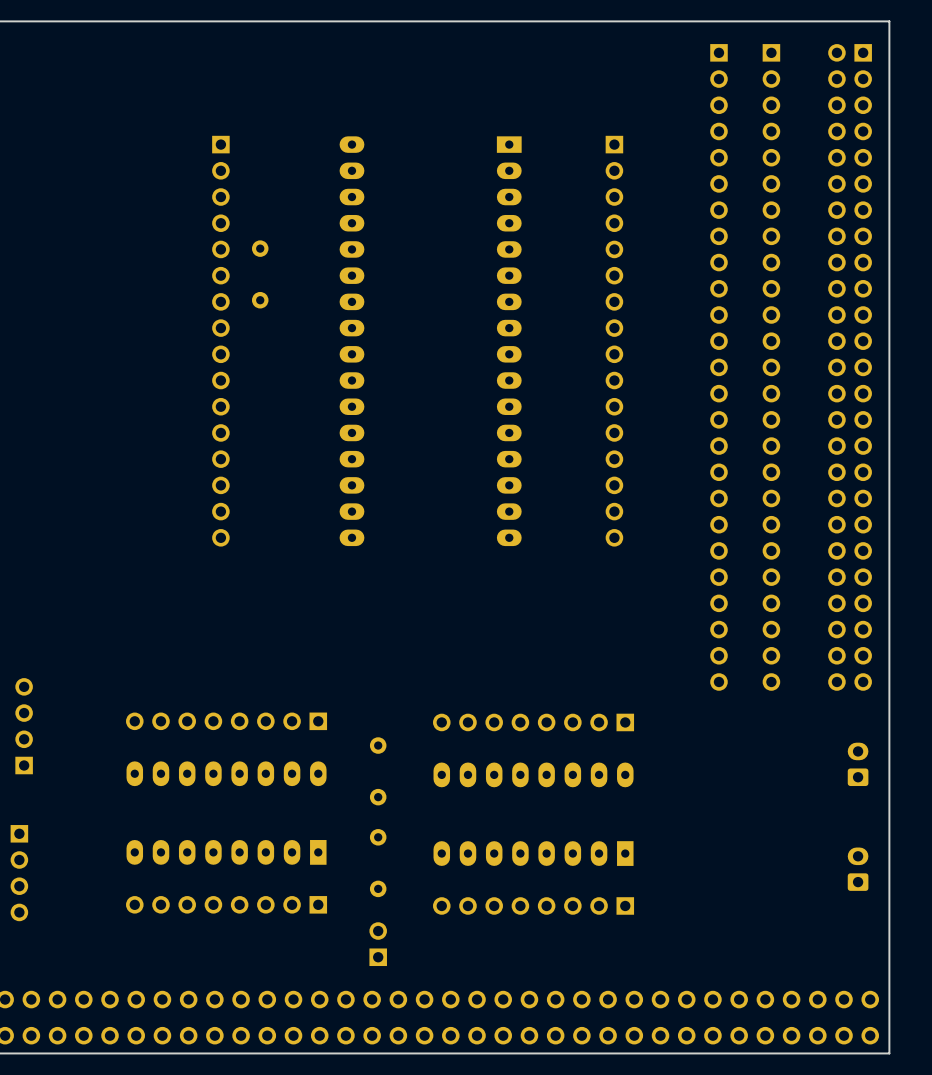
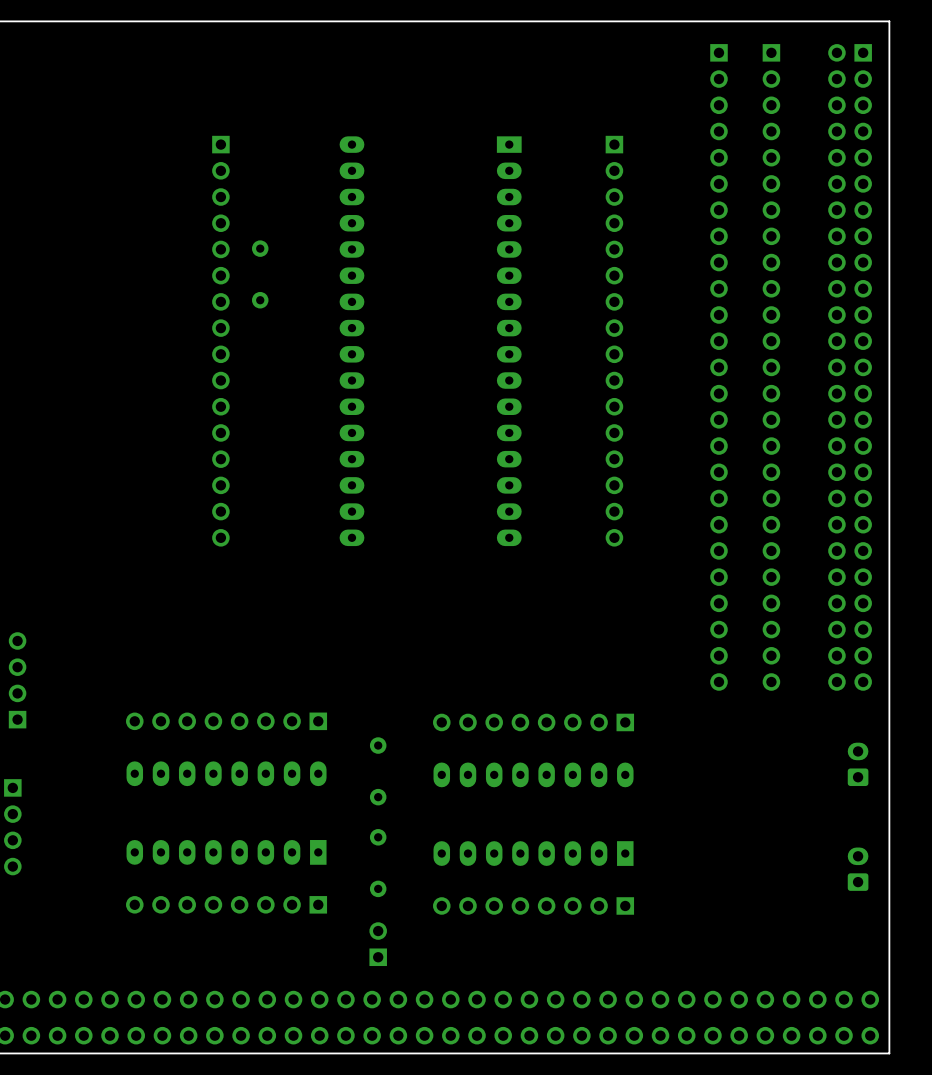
part position: (24, 726) -> (17, 680)
part position: (19, 873) -> (12, 827)

